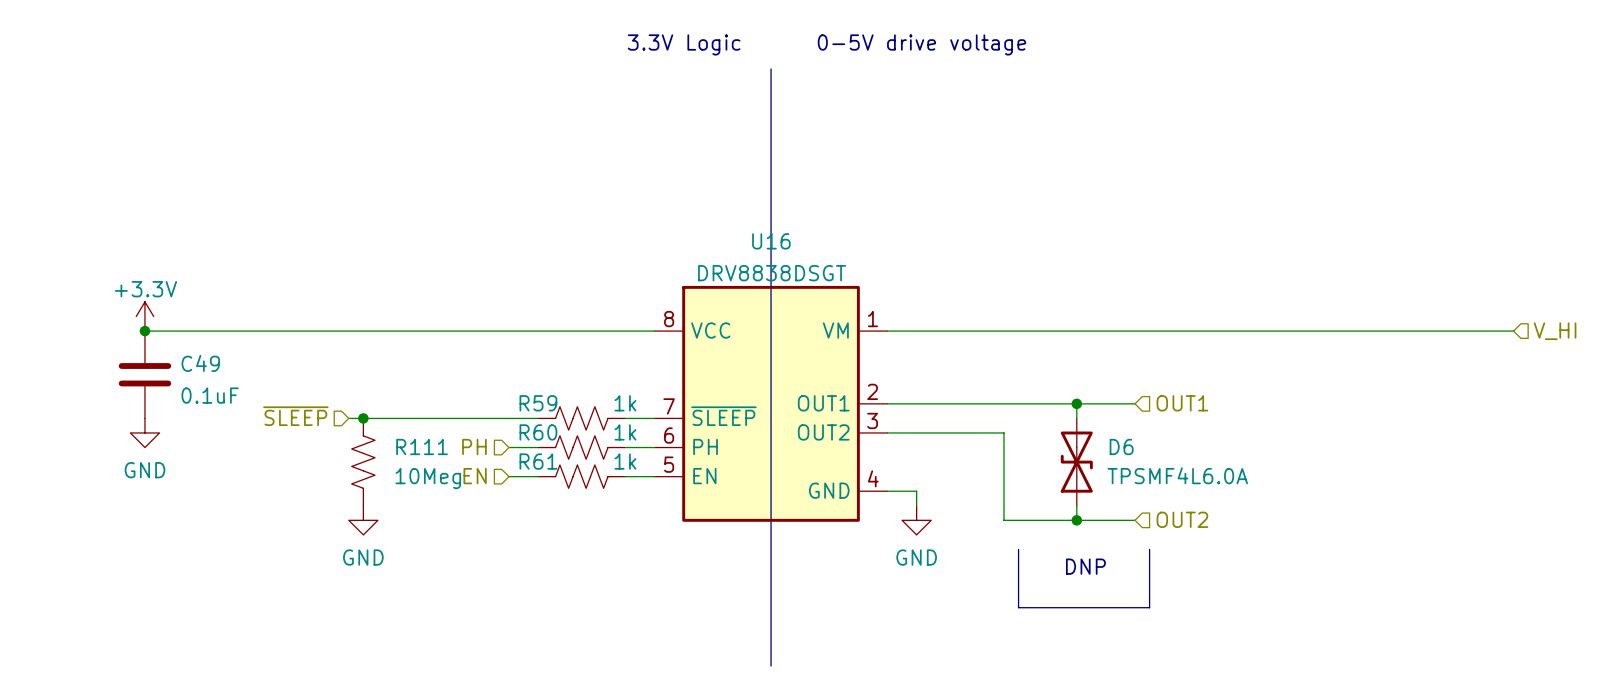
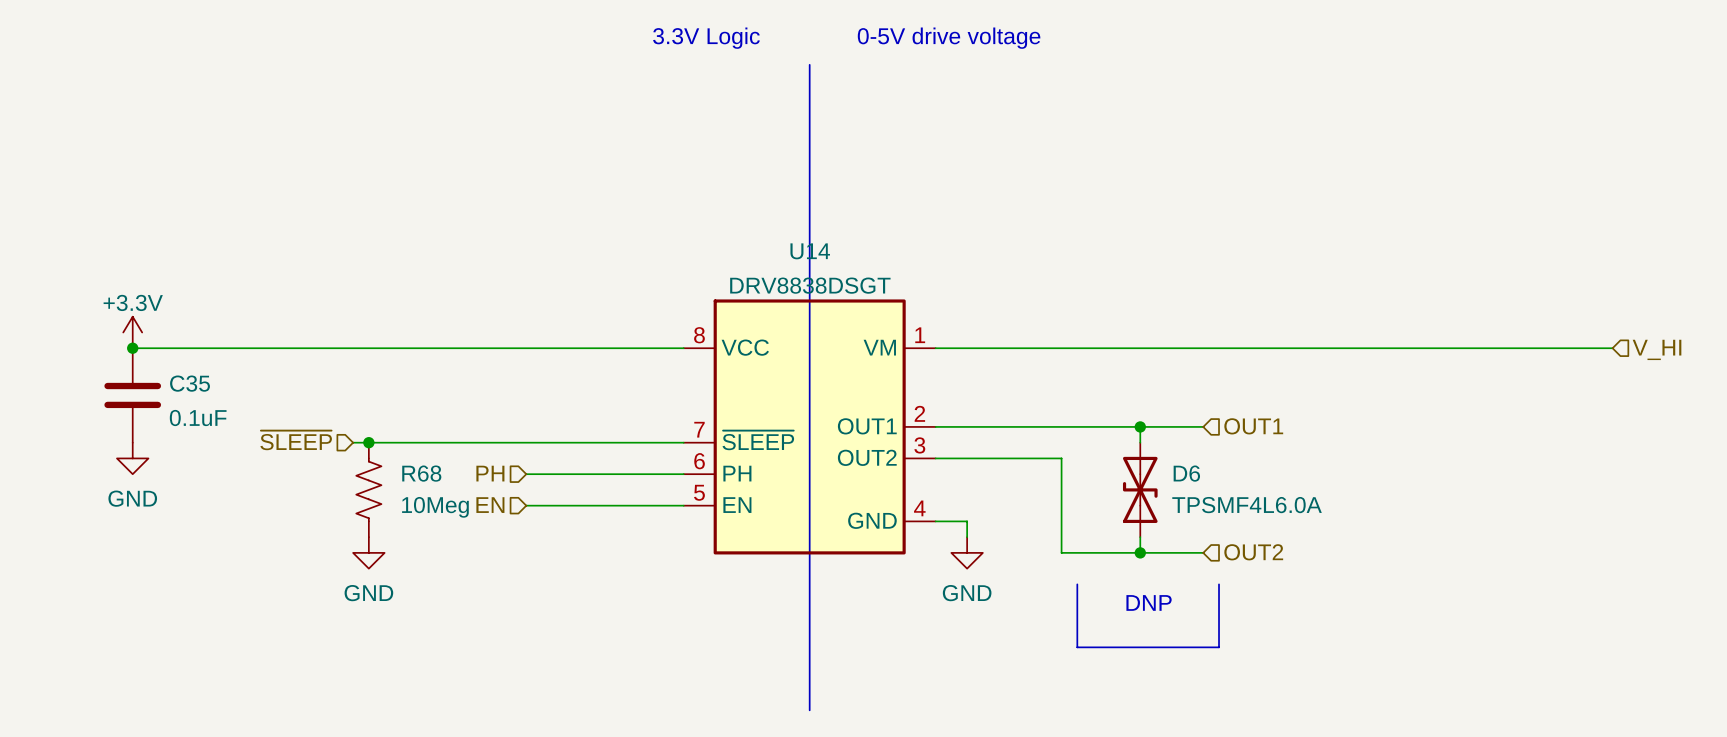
U16 name: U16 (771, 241) -> U14 (810, 251)
C49 name: C49 (200, 363) -> C35 (190, 383)
R59: 1k (581, 418) -> none
R111 name: R111 (422, 446) -> R68 (421, 473)
R60: 1k (581, 447) -> none
R61: 1k (581, 476) -> none

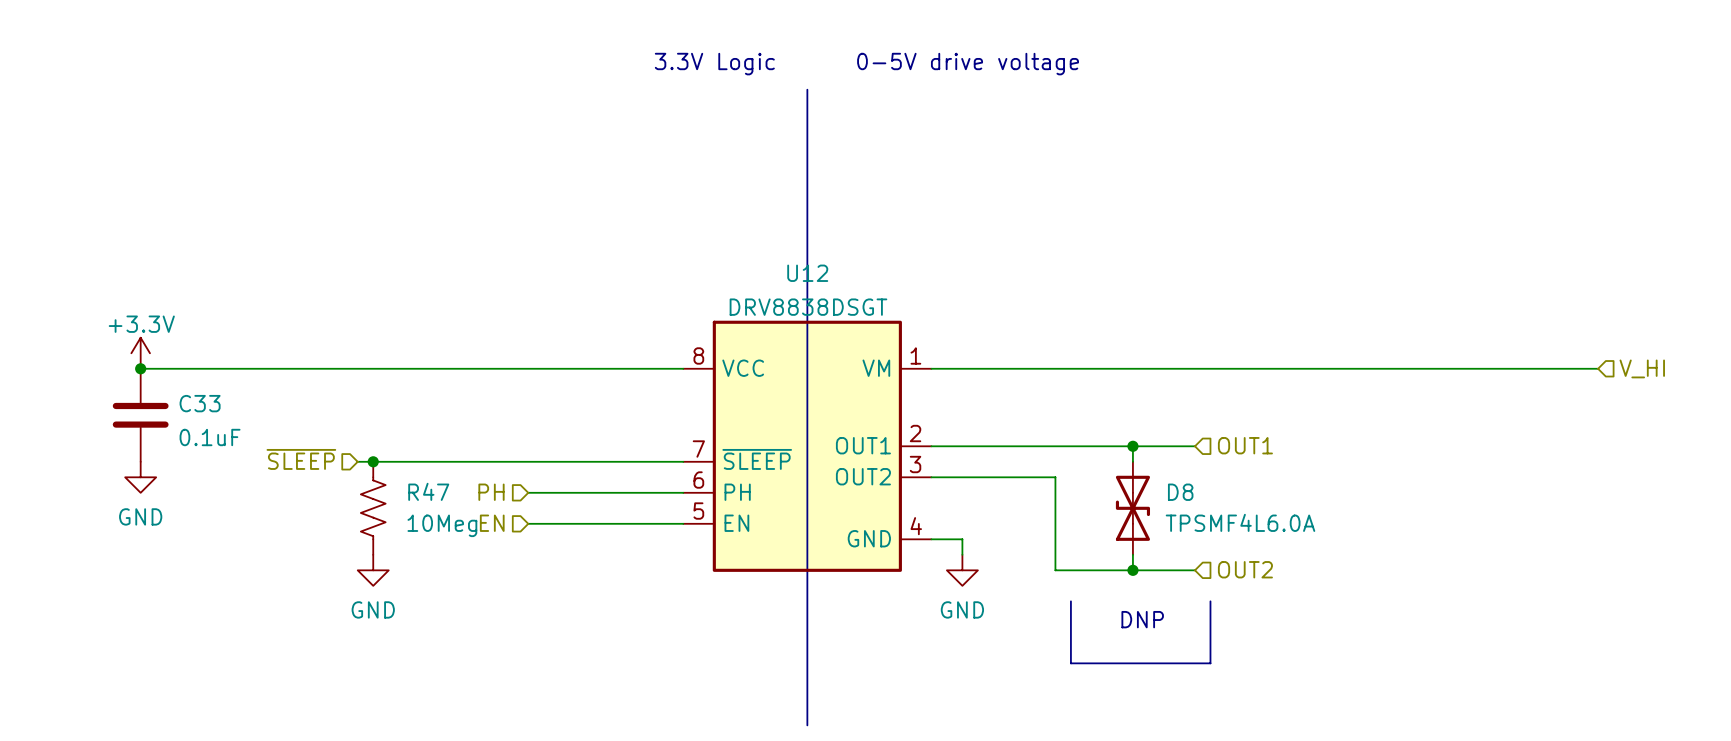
U14 name: U14 (810, 251) -> U12 (807, 273)
C35 name: C35 (190, 383) -> C33 (200, 403)
R68 name: R68 (421, 473) -> R47 (428, 491)
D6 name: D6 (1186, 473) -> D8 (1180, 492)

